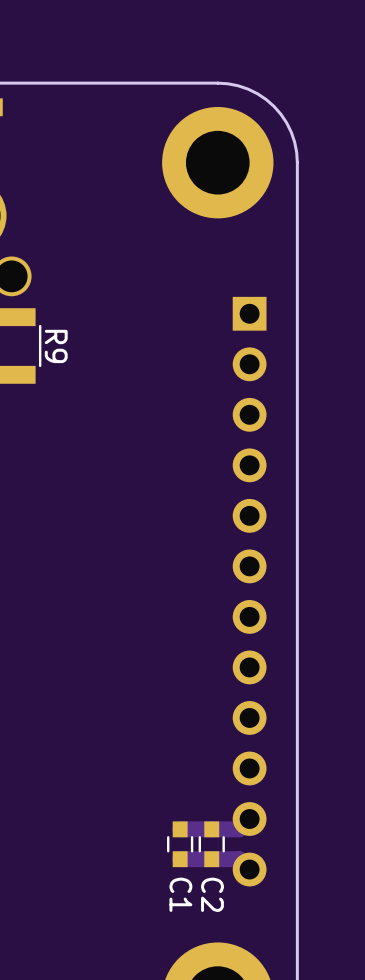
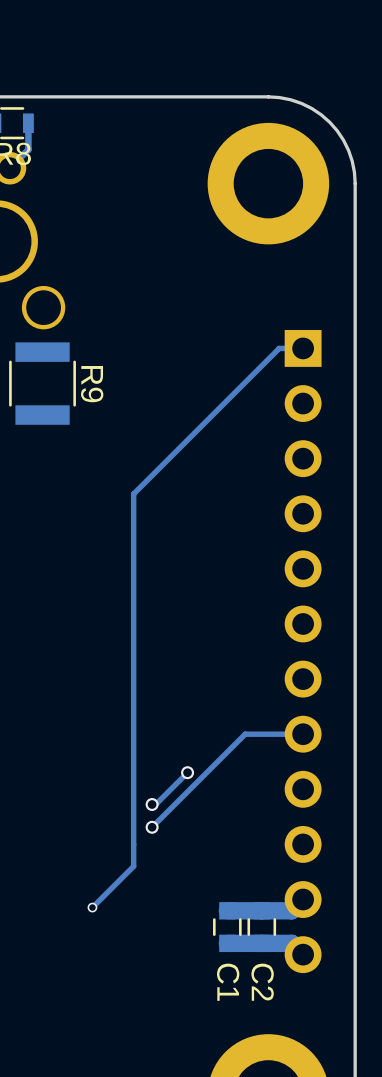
track: none -> (303, 348) (279, 348) (133, 494) (133, 866) (92, 907)
track: none -> (303, 734) (245, 734) (152, 827)
track: none -> (187, 772) (155, 804) (152, 804)
via: none -> (187, 772)
via: none -> (152, 804)
via: none -> (152, 827)
via: none -> (92, 907)

